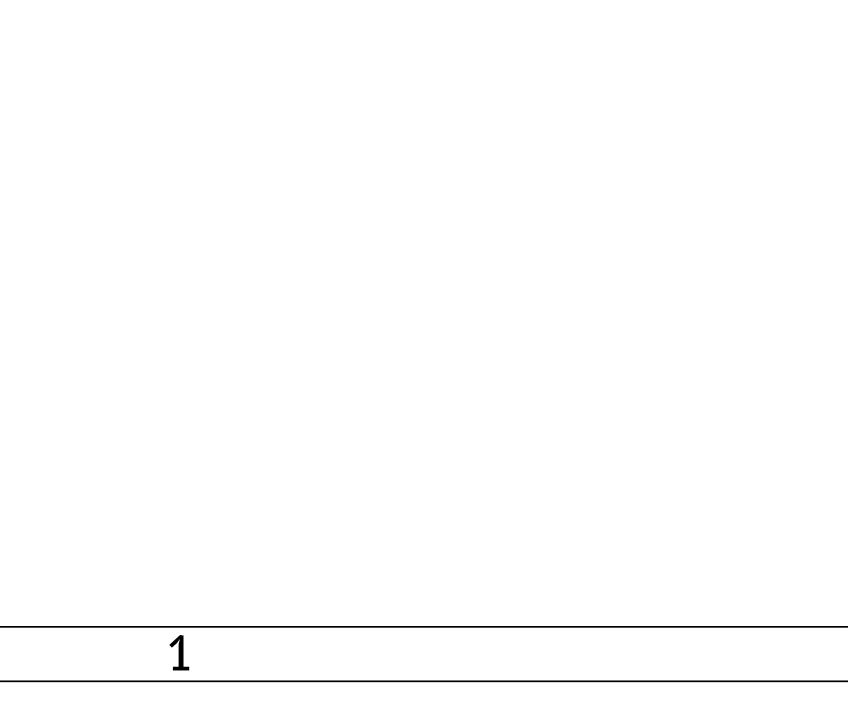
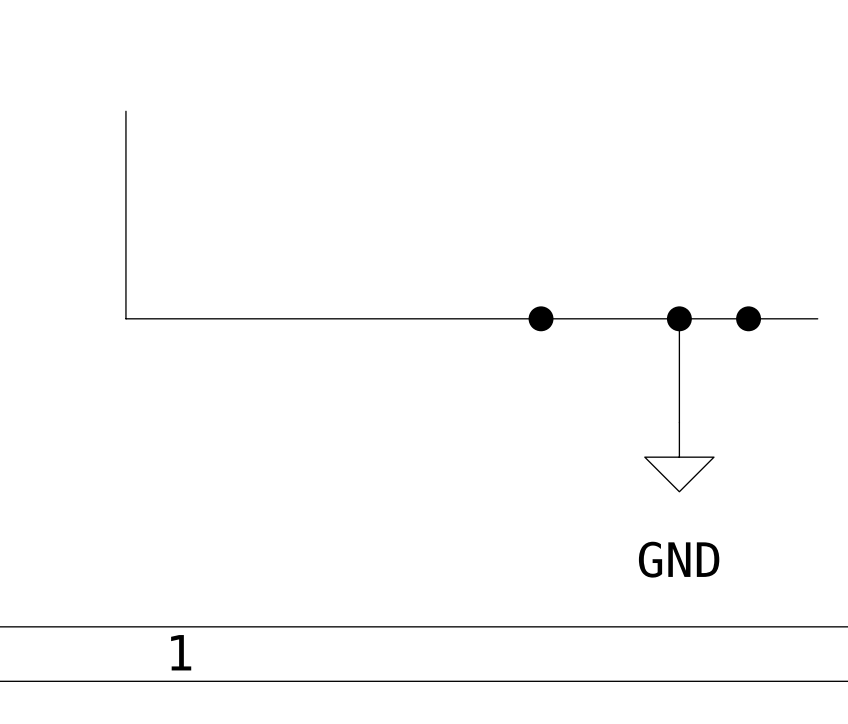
wire: none -> (125, 111) (125, 318) (817, 318)
junction: none -> (541, 318)
wire: none -> (679, 318) (679, 422)
junction: none -> (679, 318)
junction: none -> (748, 318)
power symbol: none -> GND (679, 457)

